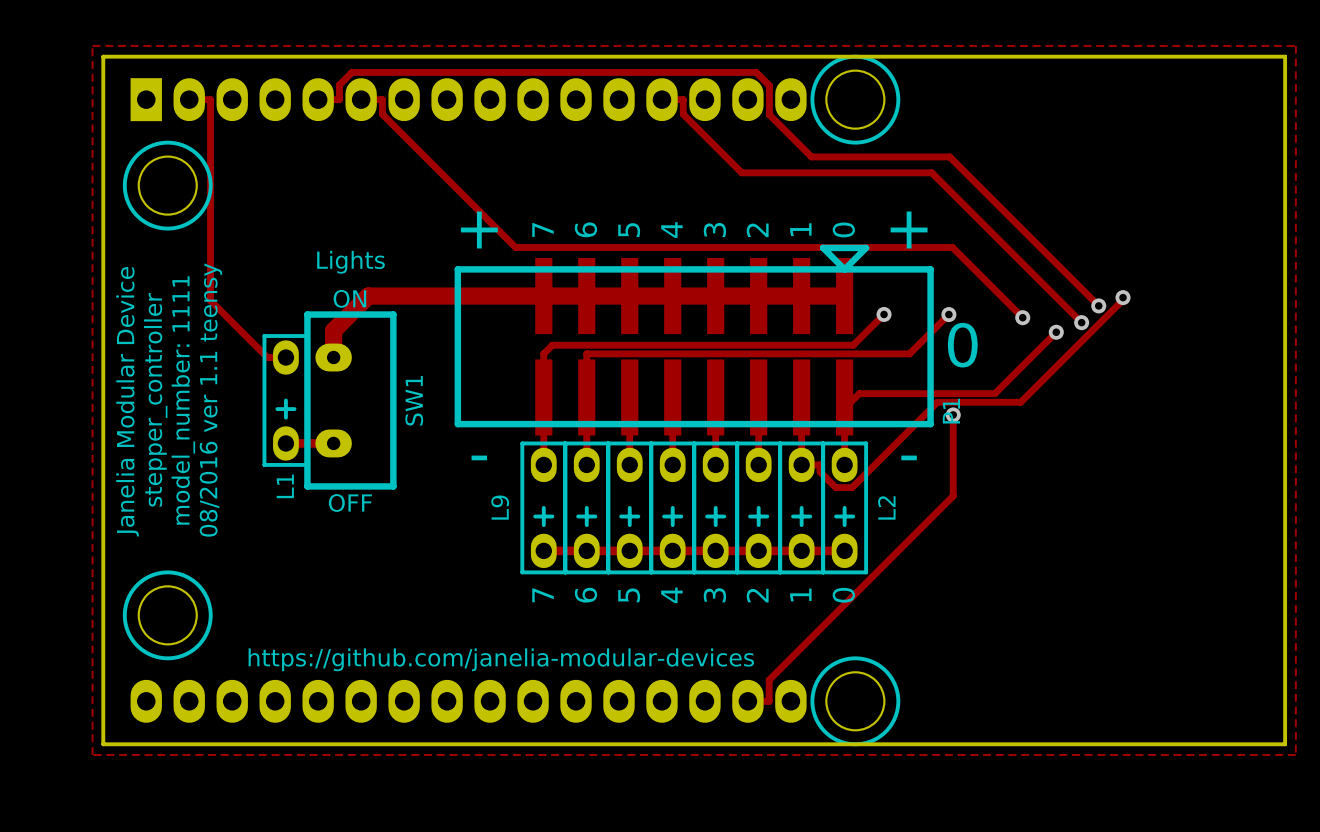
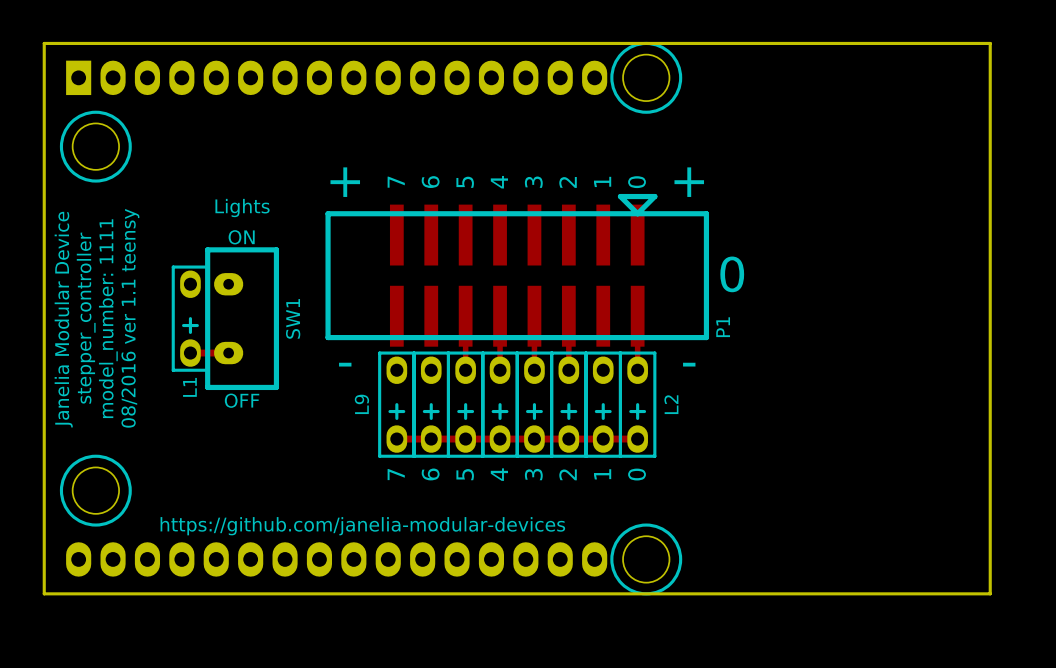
zone outline: (92, 45) (92, 755) (1295, 755) (1295, 45) (92, 45) -> none
track: (189, 99) (210, 99) (210, 300) (267, 357) (285, 357) -> none
track: (318, 99) (339, 99) (339, 85) (351, 72) (756, 72) (769, 85) (769, 114) (811, 156) (949, 156) (1098, 305) -> none
track: (361, 99) (382, 99) (382, 114) (515, 247) (952, 247) (1022, 317) -> none
track: (661, 99) (683, 99) (683, 114) (741, 172) (931, 172) (1081, 322) -> none
track: (844, 296) (368, 296) (333, 330) (333, 357) -> none
track: (1123, 297) (1123, 300) (1020, 402) (937, 402) (852, 487) (835, 487) (820, 471) (820, 464) (801, 464) (801, 397) -> none
via: (1123, 297) -> none
via: (1098, 305) -> none
track: (884, 314) (853, 345) (552, 345) (543, 353) (543, 464) -> none
via: (884, 314) -> none
track: (948, 314) (909, 353) (586, 353) (586, 464) -> none
via: (948, 314) -> none
via: (1022, 317) -> none
via: (1081, 322) -> none
track: (1056, 332) (994, 393) (859, 393) (844, 408) -> none
via: (1056, 332) -> none
track: (953, 414) (953, 495) (769, 680) (769, 701) (747, 701) -> none
via: (953, 414) -> none

